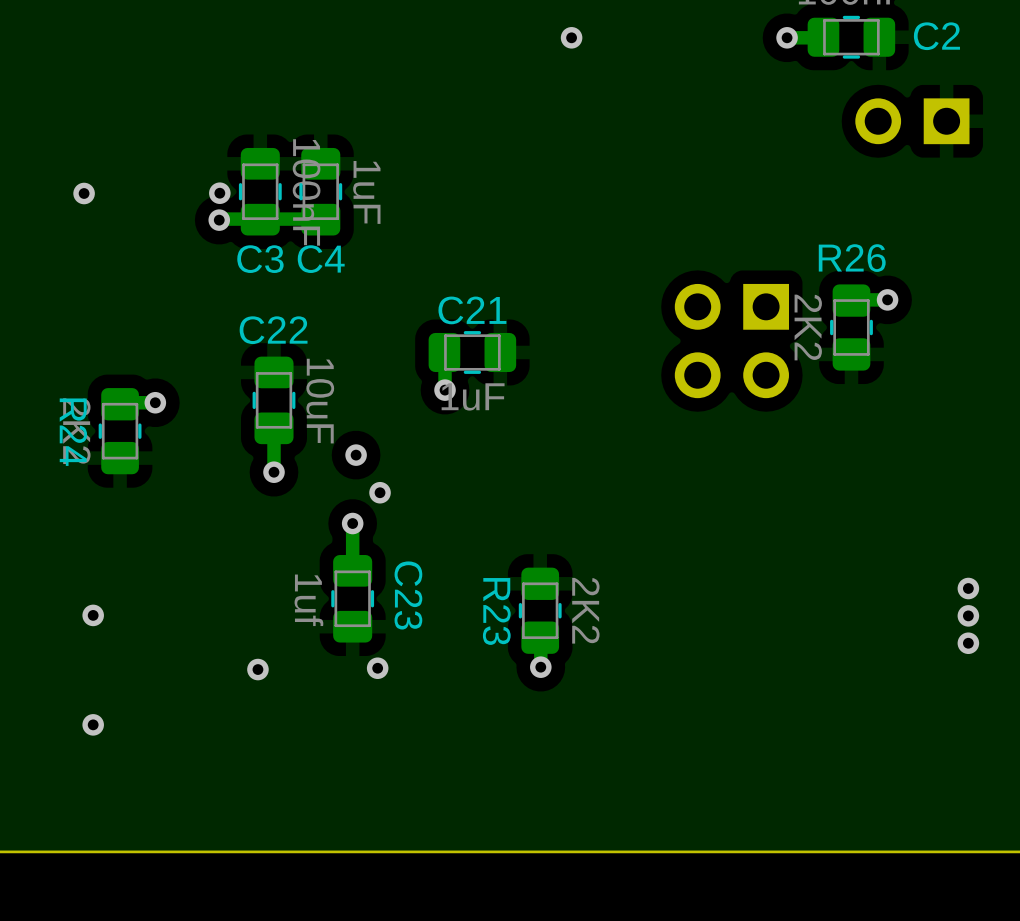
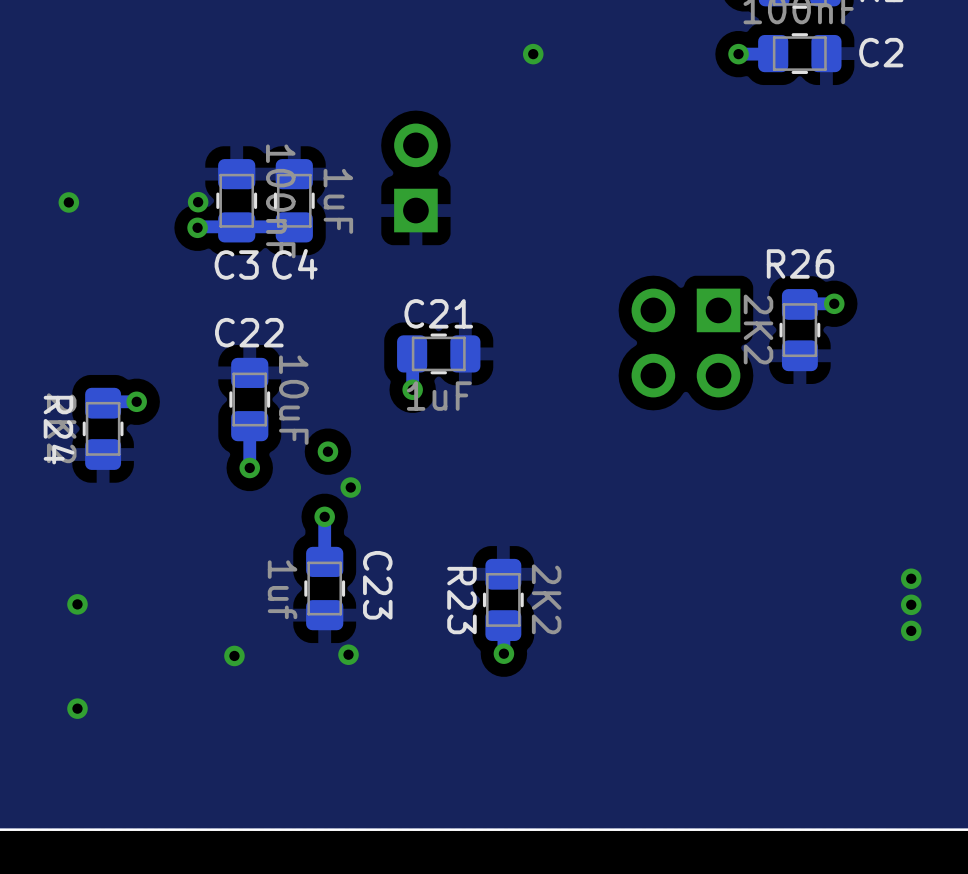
part rotation: 0° (912, 121) -> 90° clockwise (415, 177)
part position: (912, 121) -> (415, 177)

